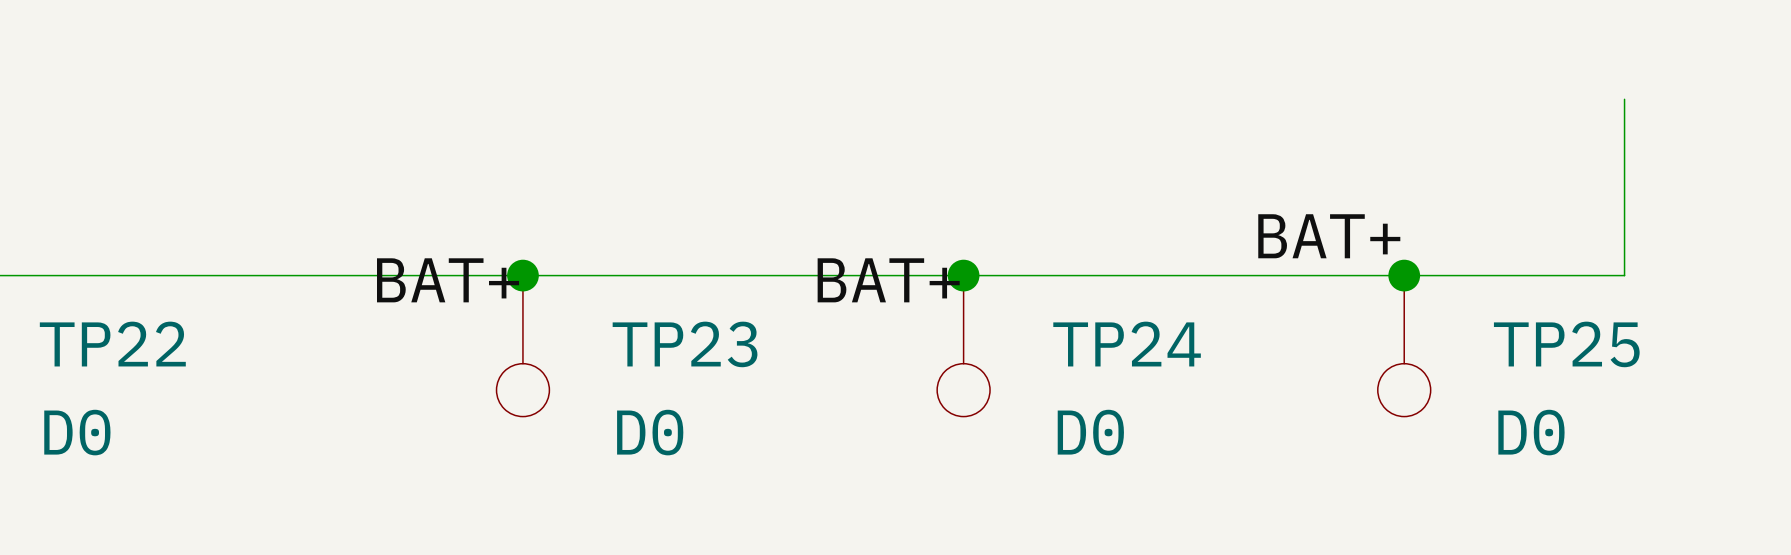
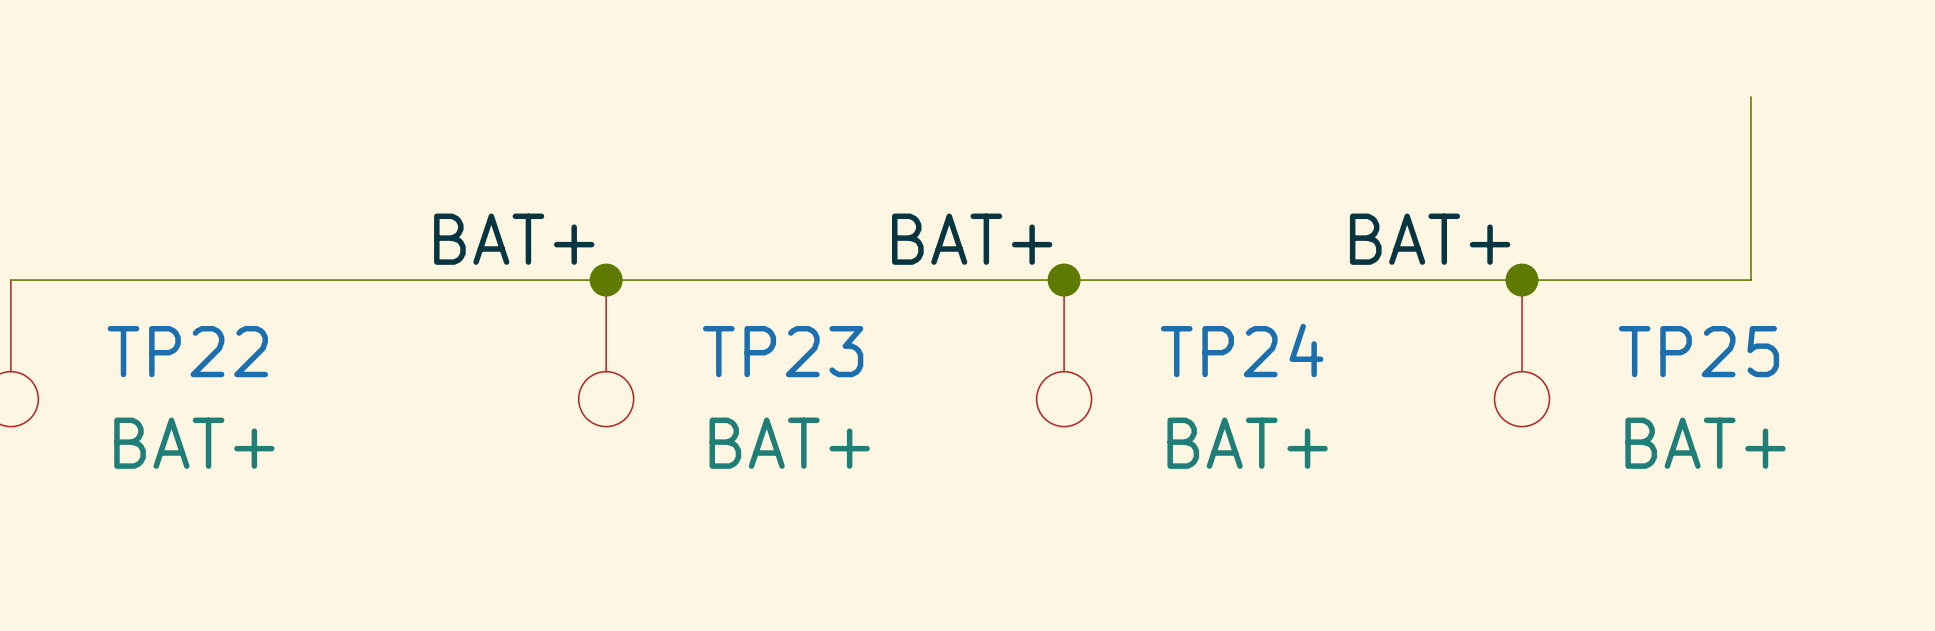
label position: BAT+ (448, 280) -> BAT+ (514, 239)
label position: BAT+ (888, 280) -> BAT+ (972, 239)
TP22 value: D0 (77, 432) -> BAT+ (194, 443)
TP23 value: D0 (650, 432) -> BAT+ (789, 443)
TP24 value: D0 (1090, 432) -> BAT+ (1247, 443)
TP25 value: D0 (1531, 432) -> BAT+ (1705, 443)

